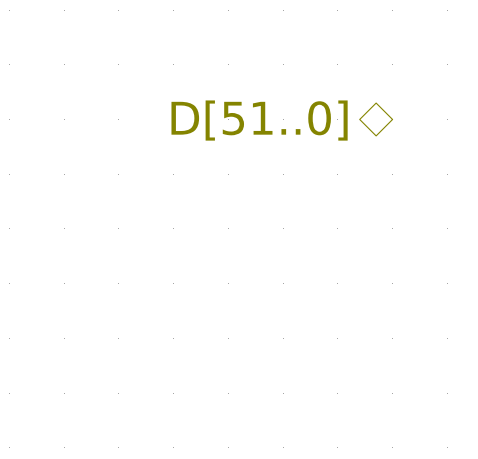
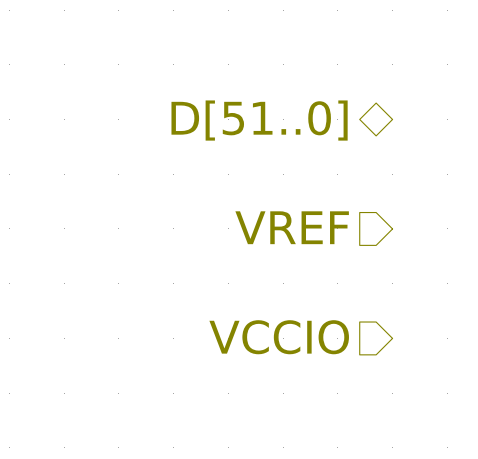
hierarchical label: none -> VREF (292, 227)
hierarchical label: none -> VCCIO (279, 337)

